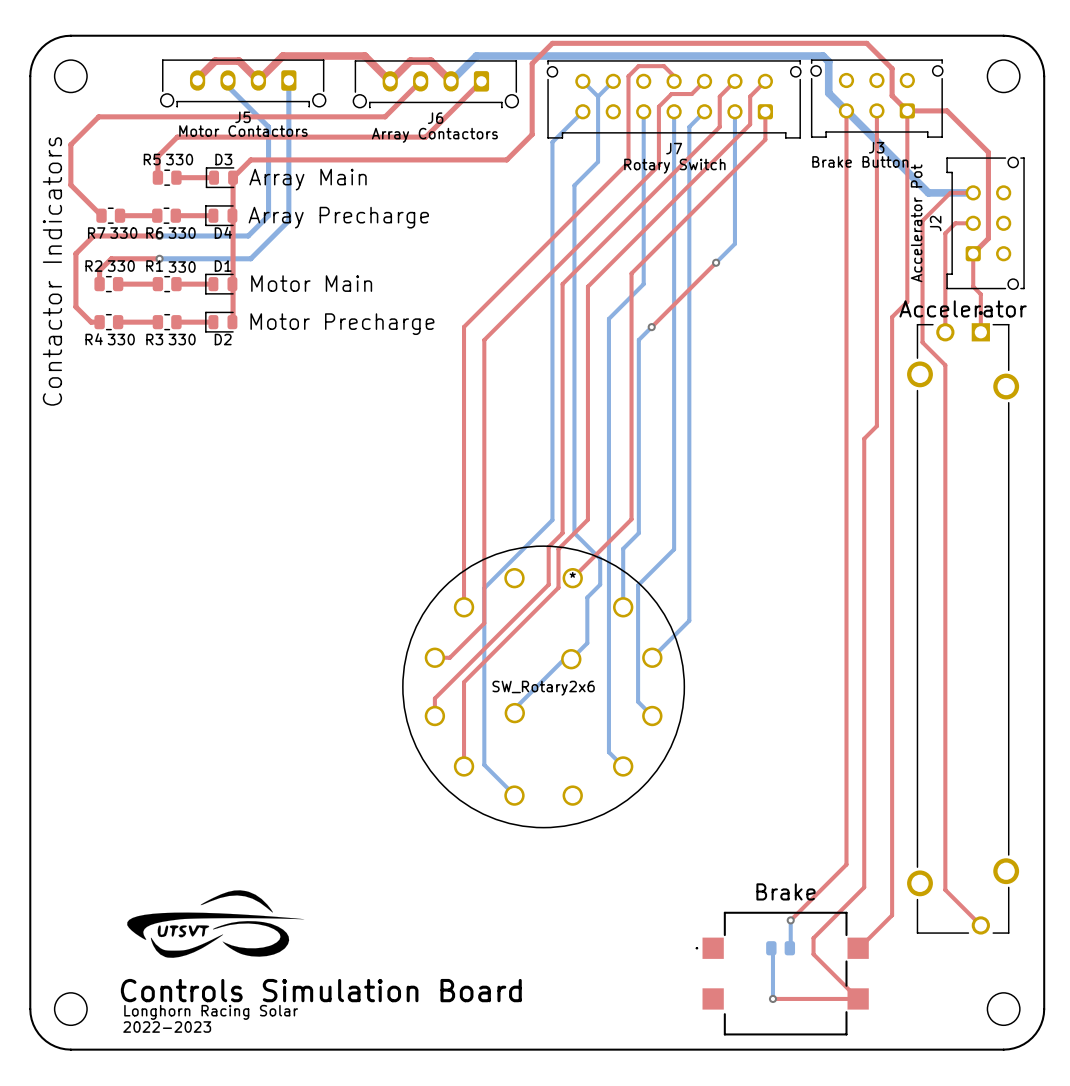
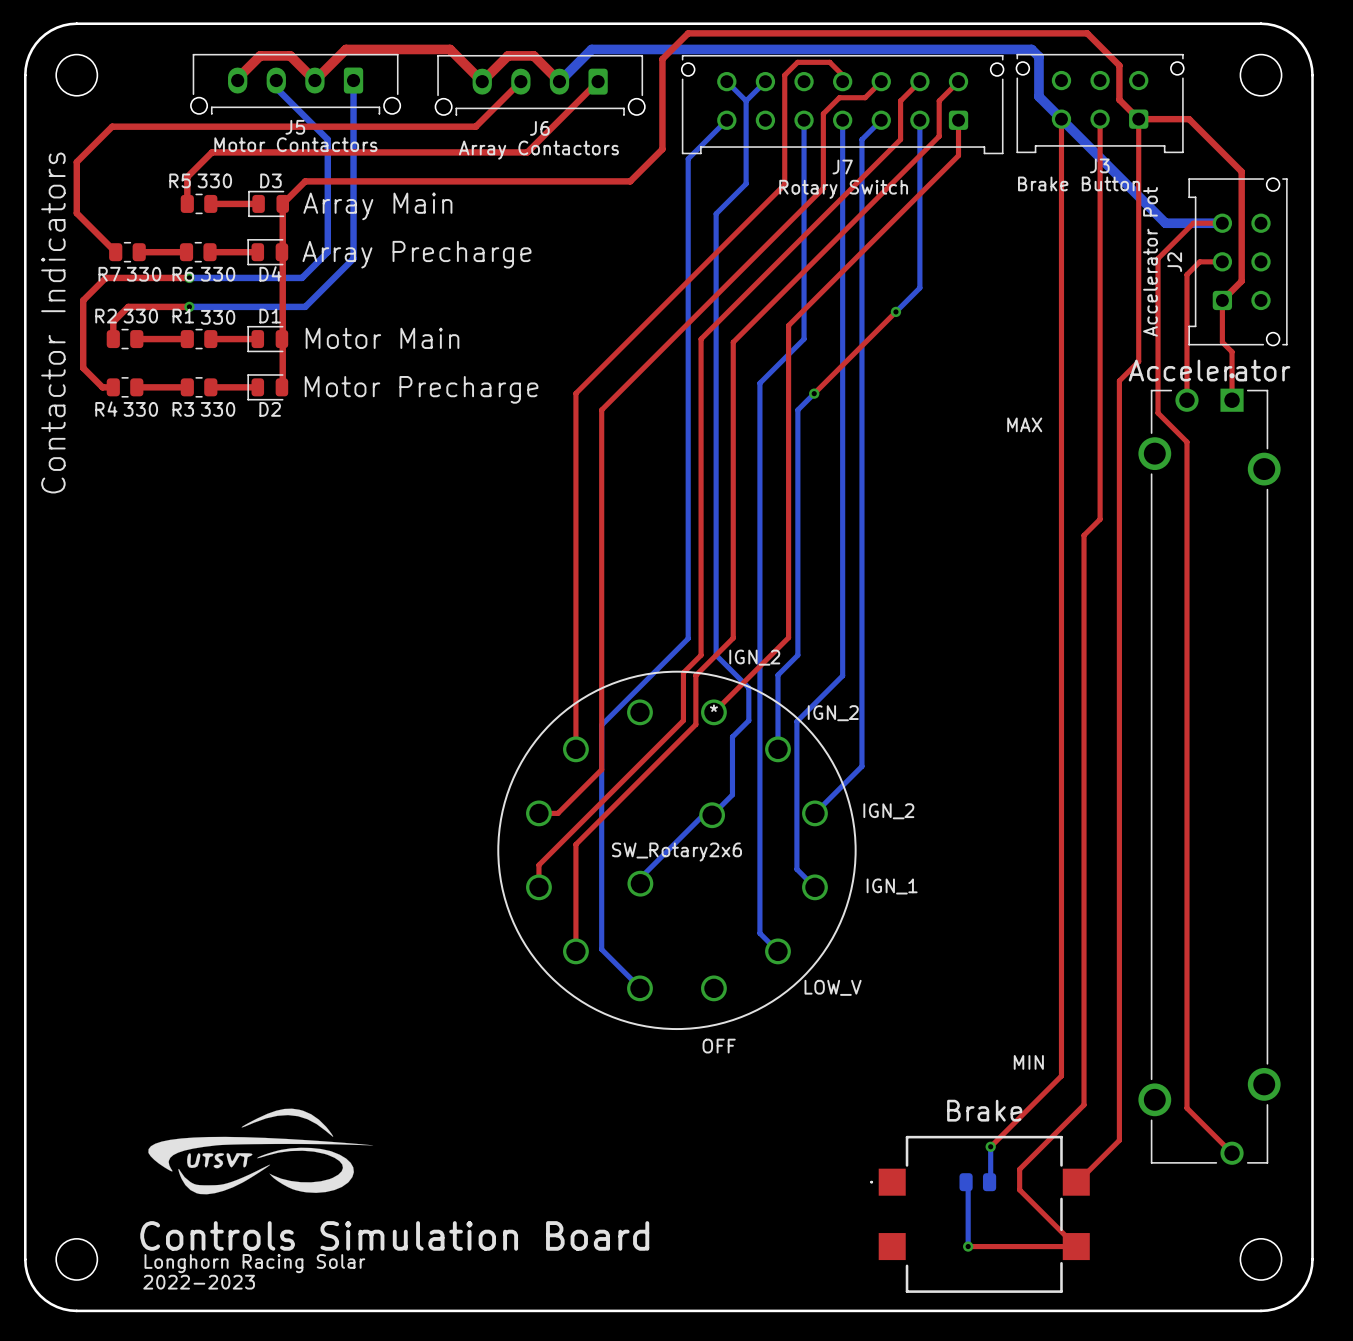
text: none -> MAX (1024, 424)
text: none -> IGN_2 (754, 657)
text: none -> IGN_2 (833, 713)
text: none -> IGN_2 (888, 811)
text: none -> IGN_1 (892, 886)
text: none -> LOW_V (833, 987)
text: none -> OFF (719, 1046)
text: none -> MIN (1028, 1062)

